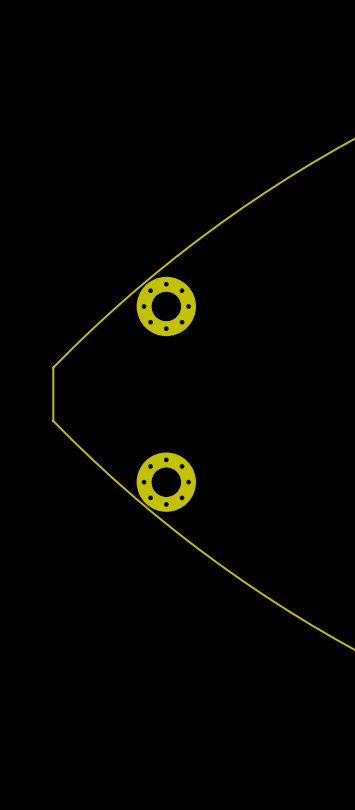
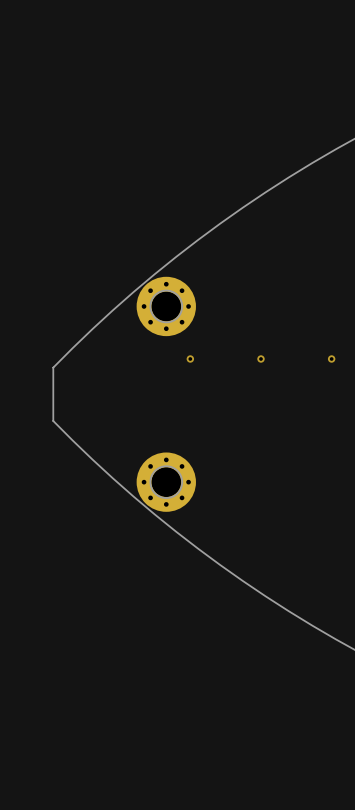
via: none -> (190, 358)
via: none -> (260, 358)
via: none -> (331, 358)

